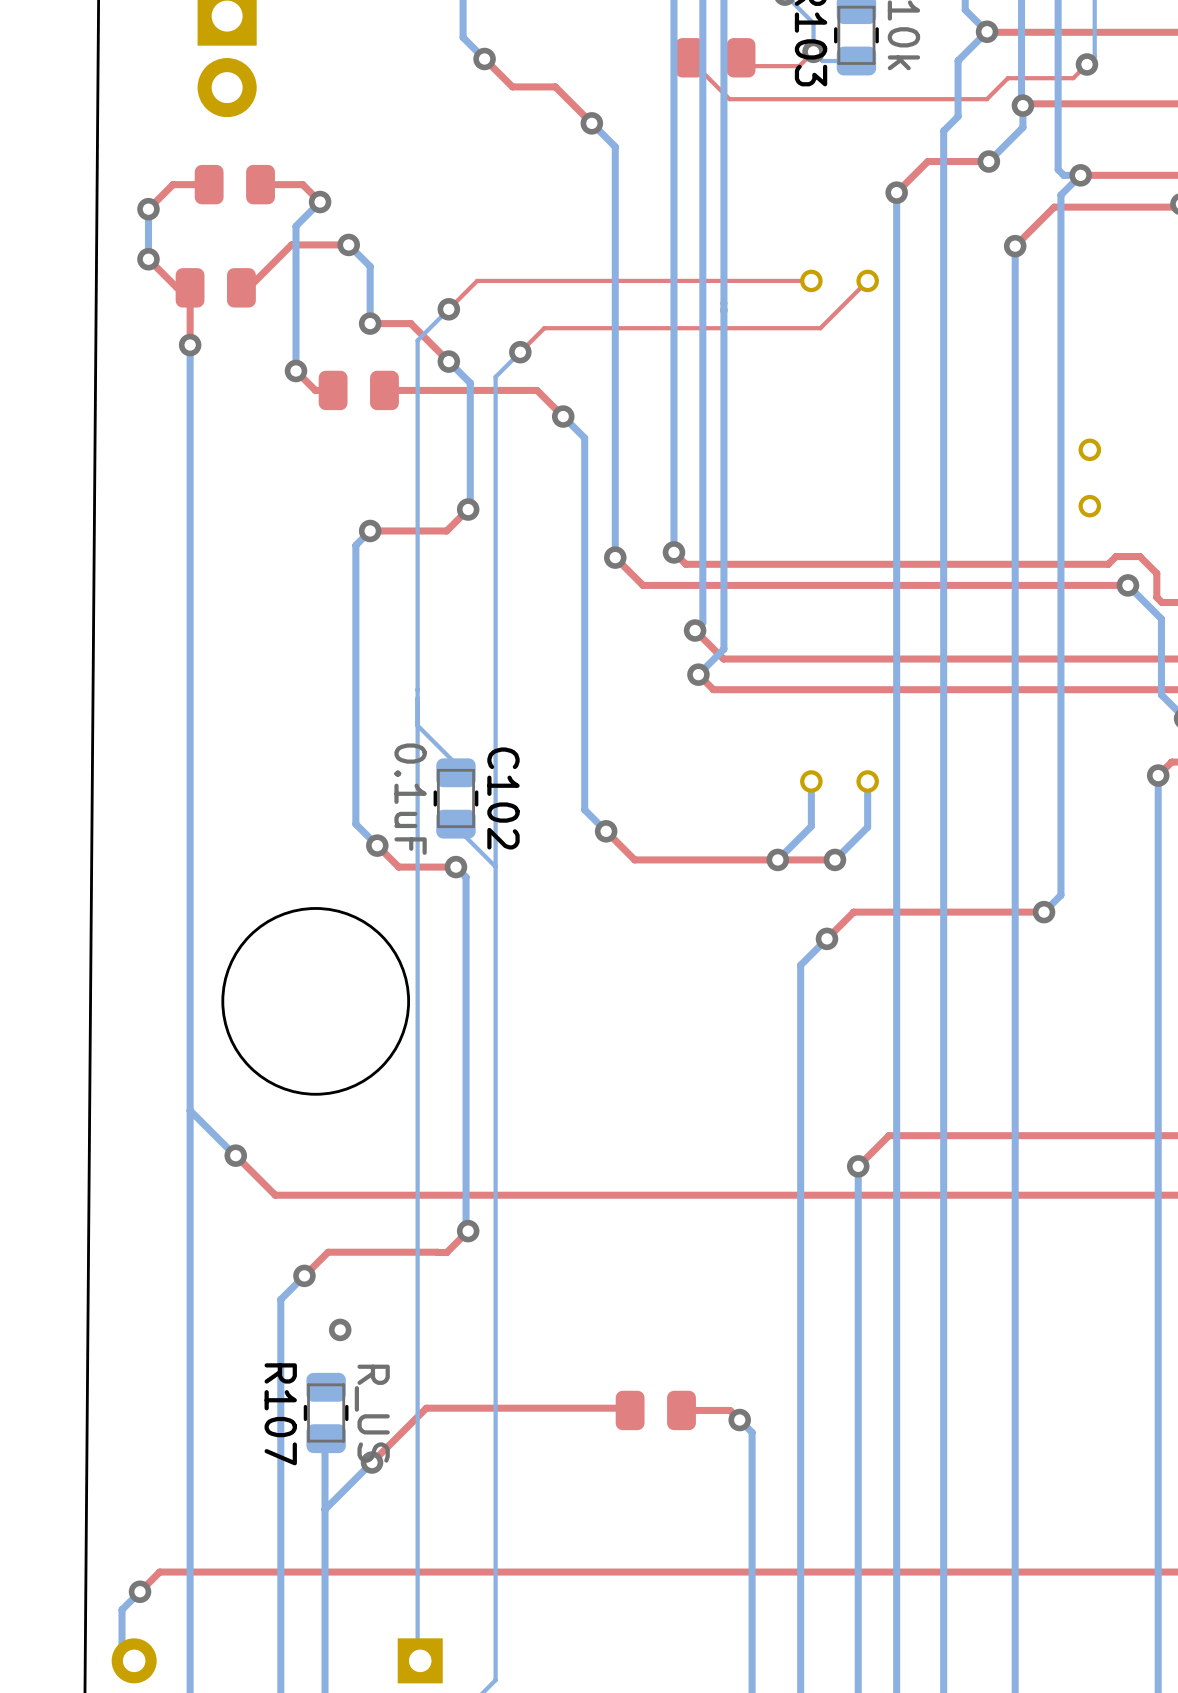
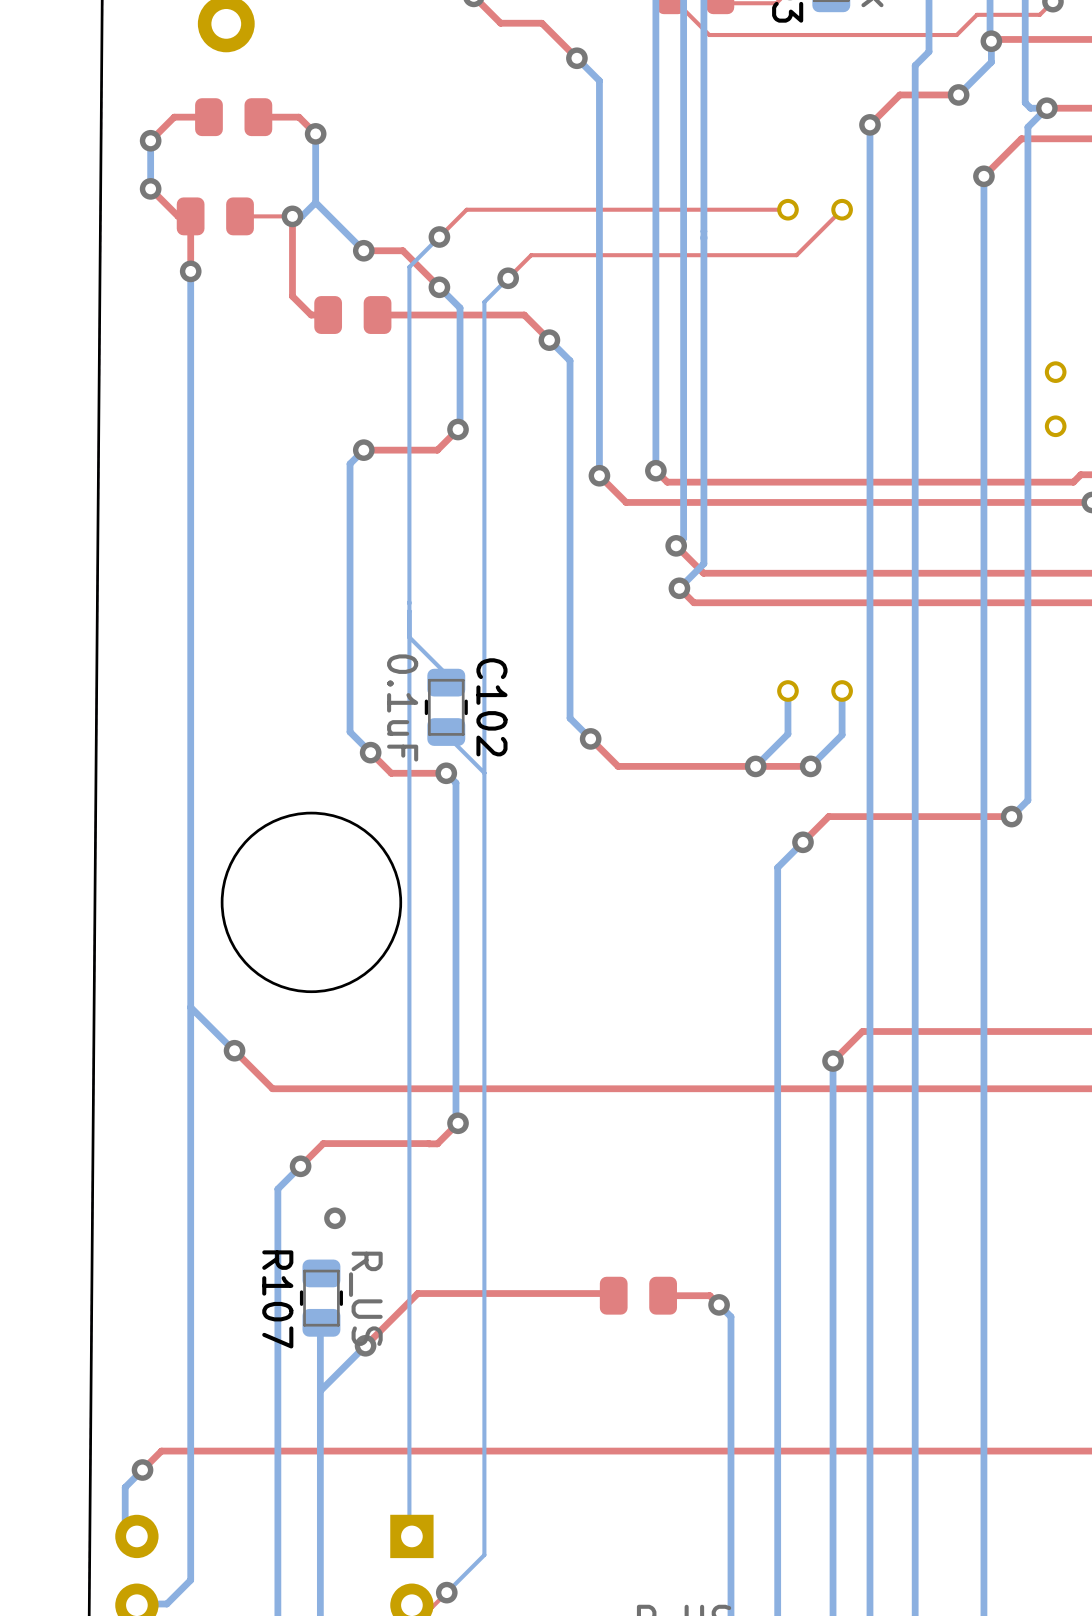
bottom track: (320, 202) (296, 226) (296, 371) -> (315, 133) (315, 202)
top track: (348, 244) (291, 244) (248, 287) -> none
bottom track: (348, 244) (370, 266) (370, 323) -> (315, 202) (363, 250)
via: (348, 244) -> none
bottom track: none -> (315, 202) (301, 216) (292, 216)
top track: none -> (240, 216) (292, 216) (292, 296)
via: none -> (292, 216)
via: (296, 371) -> none

